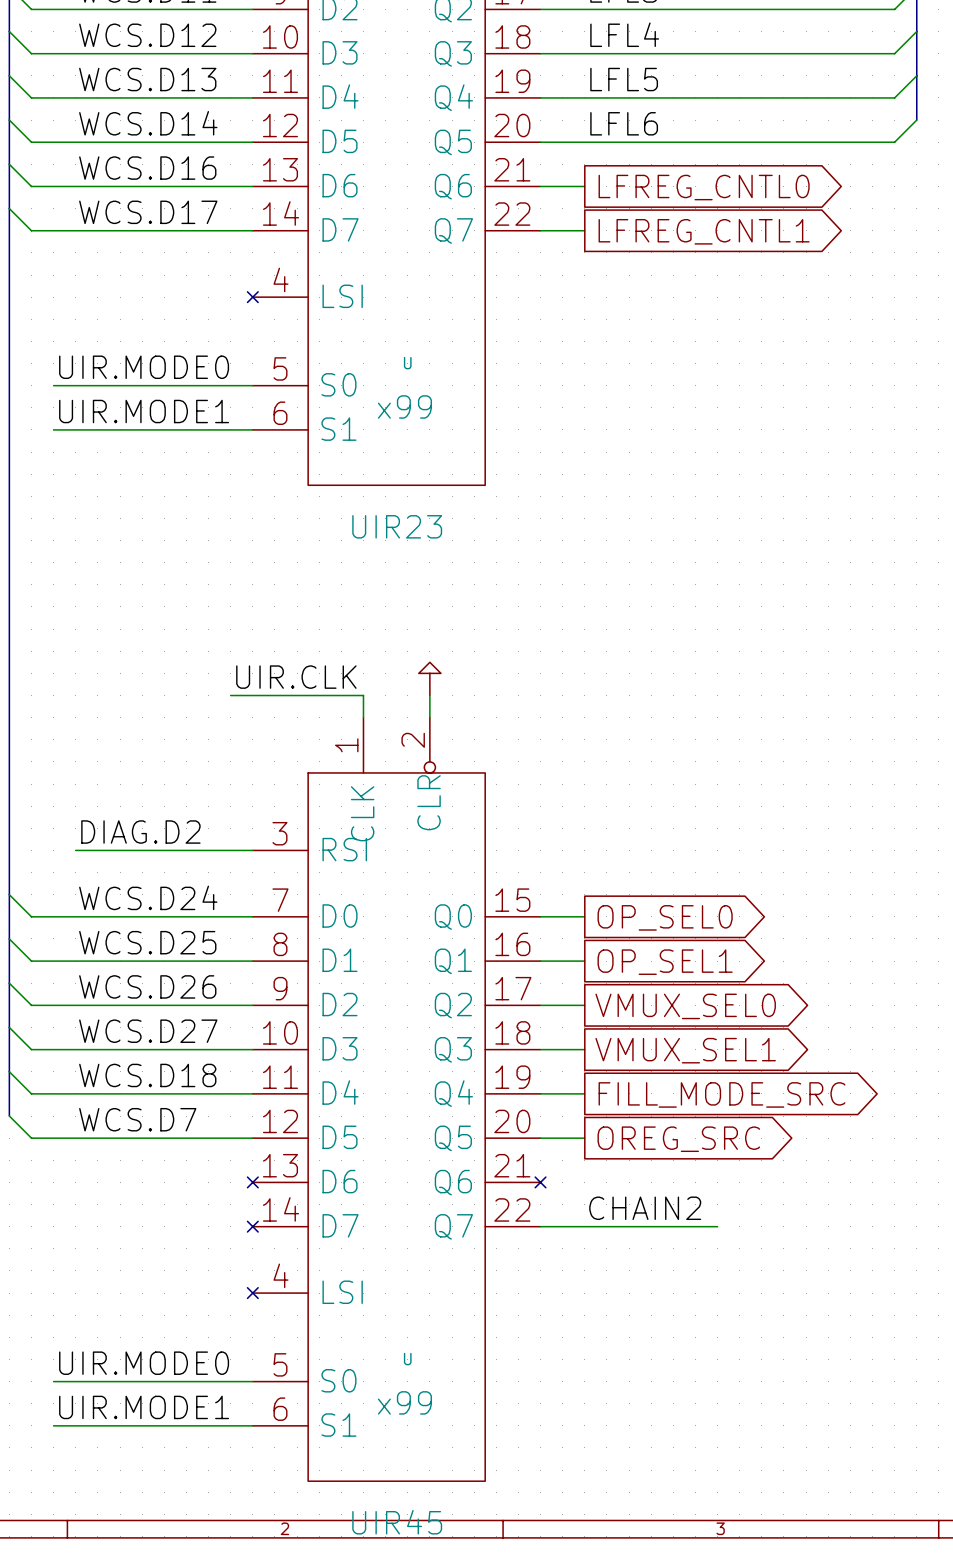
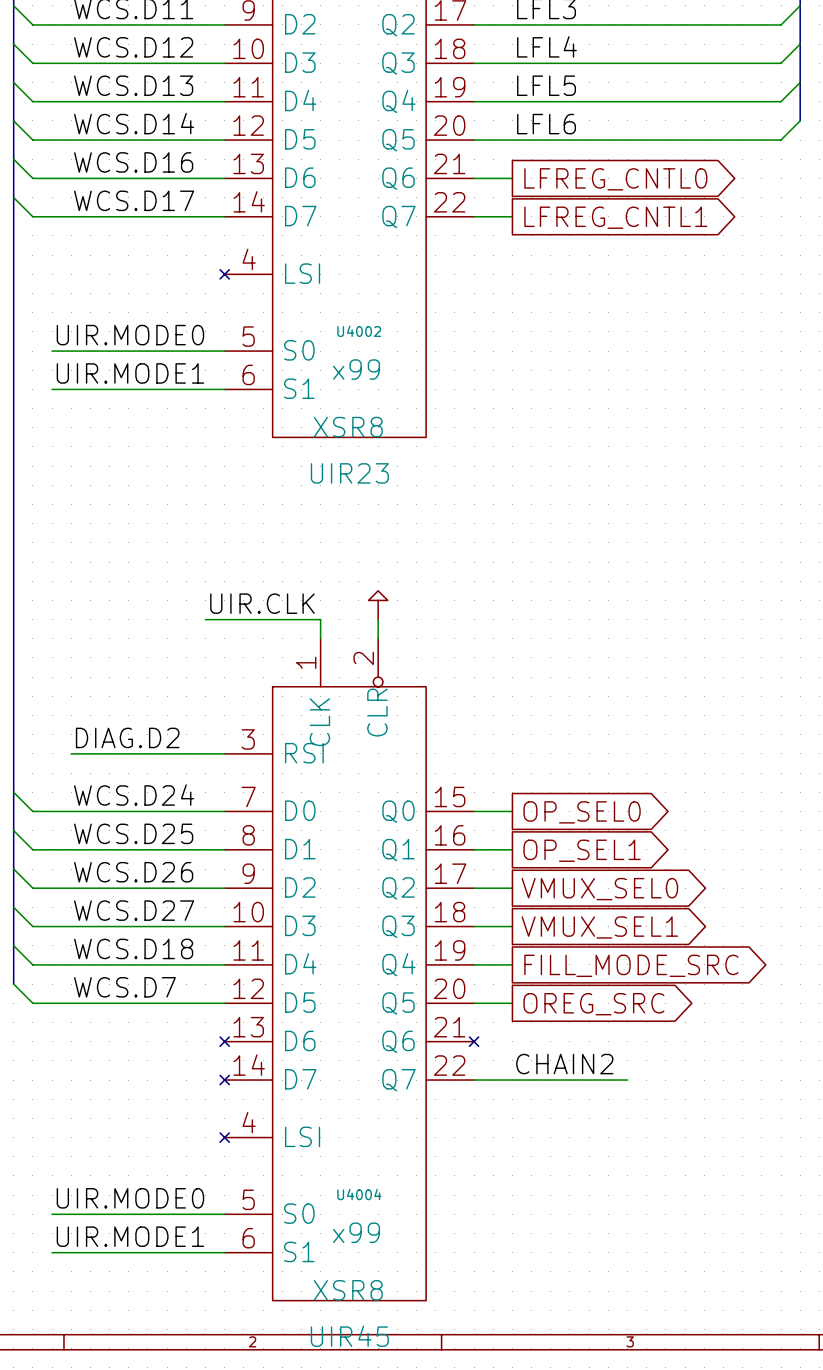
U name: U (407, 363) -> U4002 (359, 331)
U value: none -> XSR8 (348, 427)
U name: U (407, 1359) -> U4004 (359, 1194)
U value: none -> XSR8 (348, 1290)

